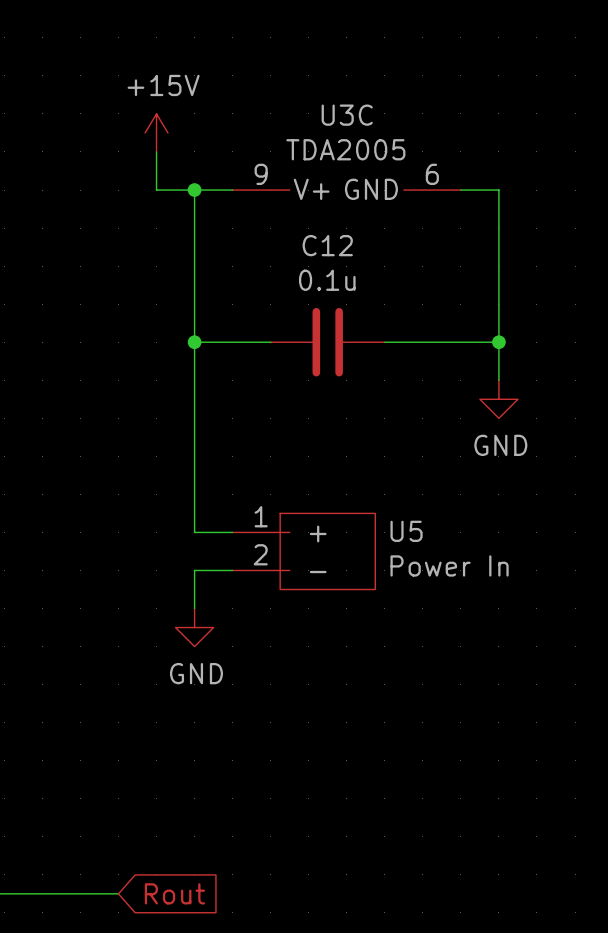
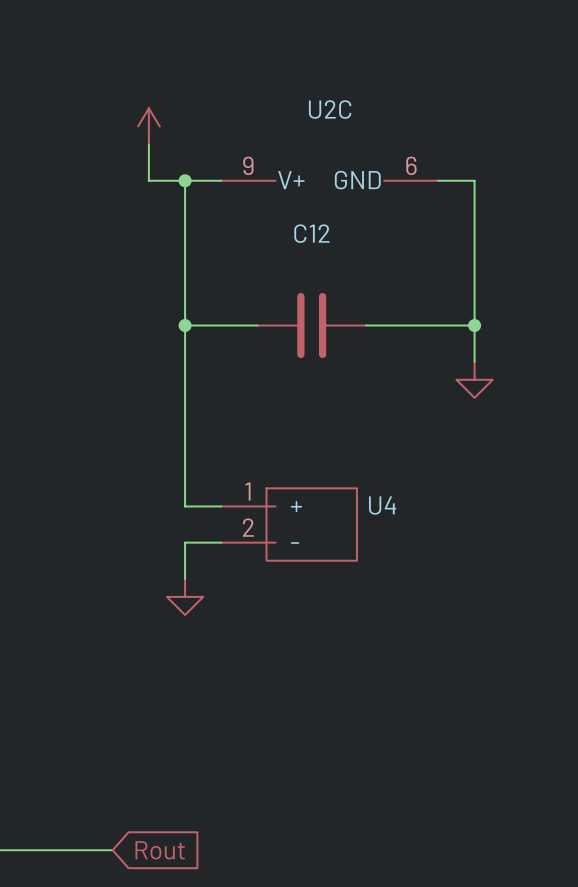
power symbol text: +15V (163, 85) -> none
U3C name: U3C (347, 115) -> U2C (330, 109)
U3C value: TDA2005 (345, 149) -> none
C12 value: 0.1u (327, 280) -> none
power symbol text: GND (500, 445) -> none
U5 name: U5 (406, 531) -> U4 (382, 505)
U5 value: Power In (449, 565) -> none
power symbol text: GND (196, 673) -> none

